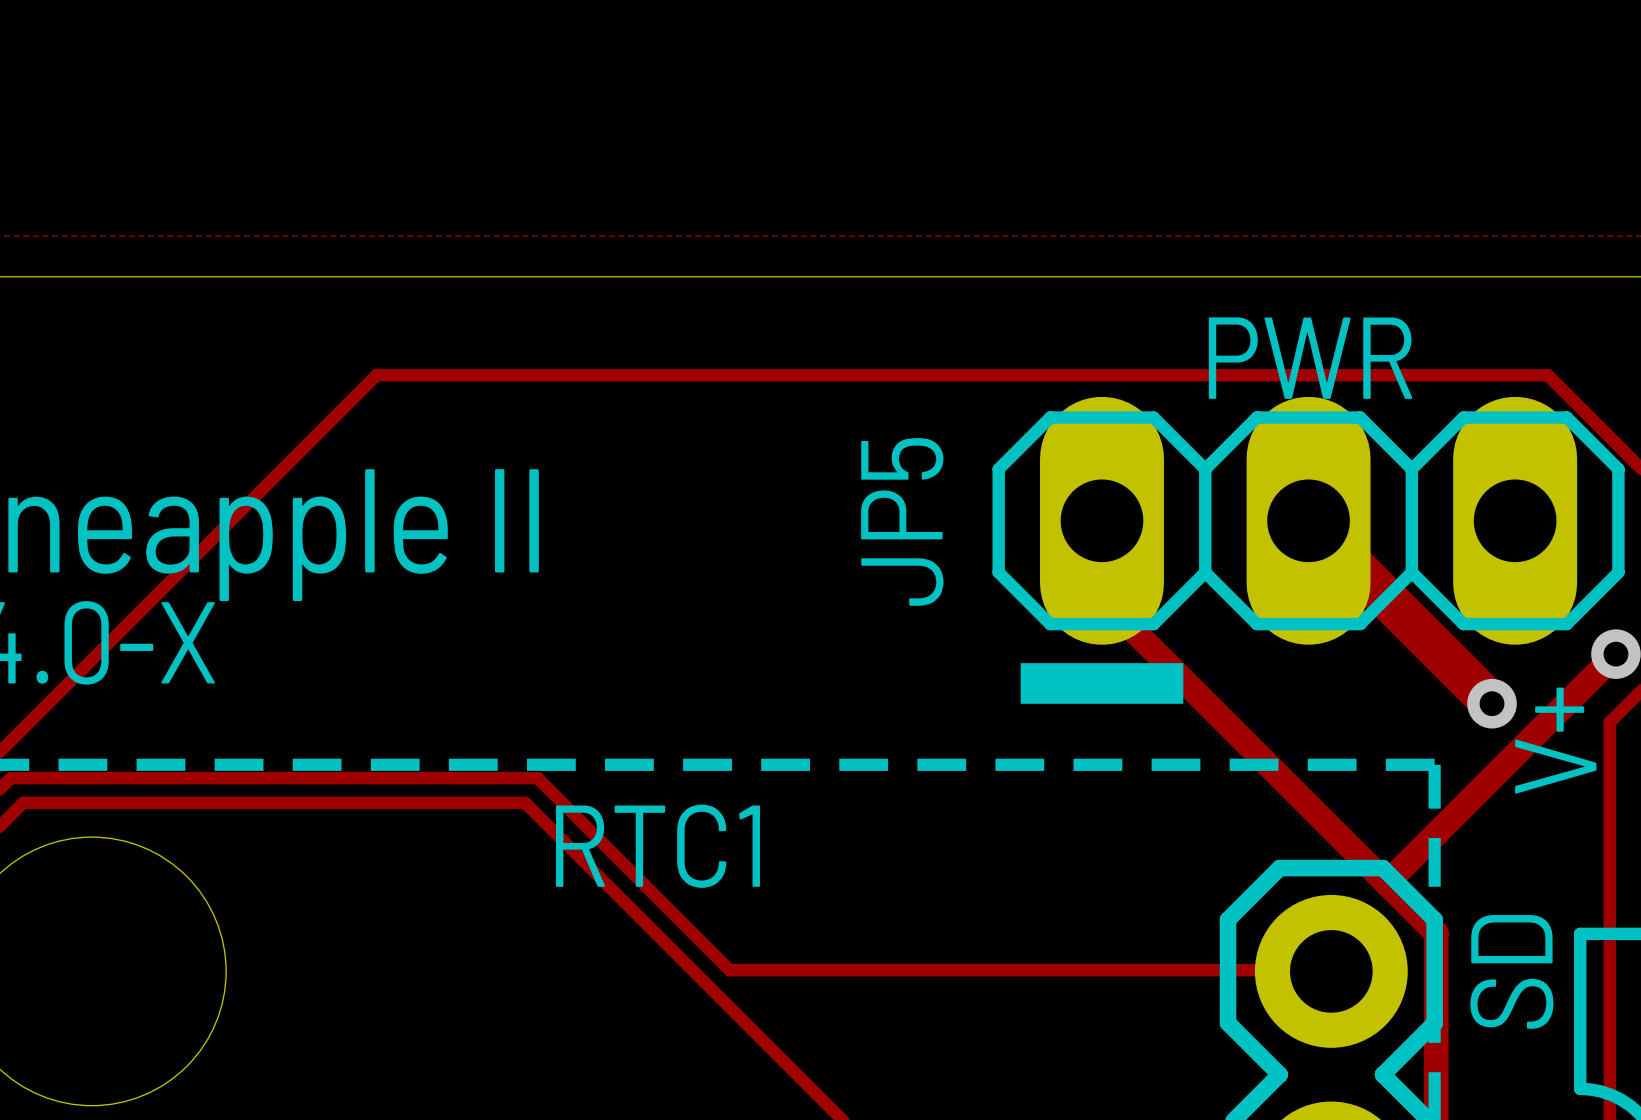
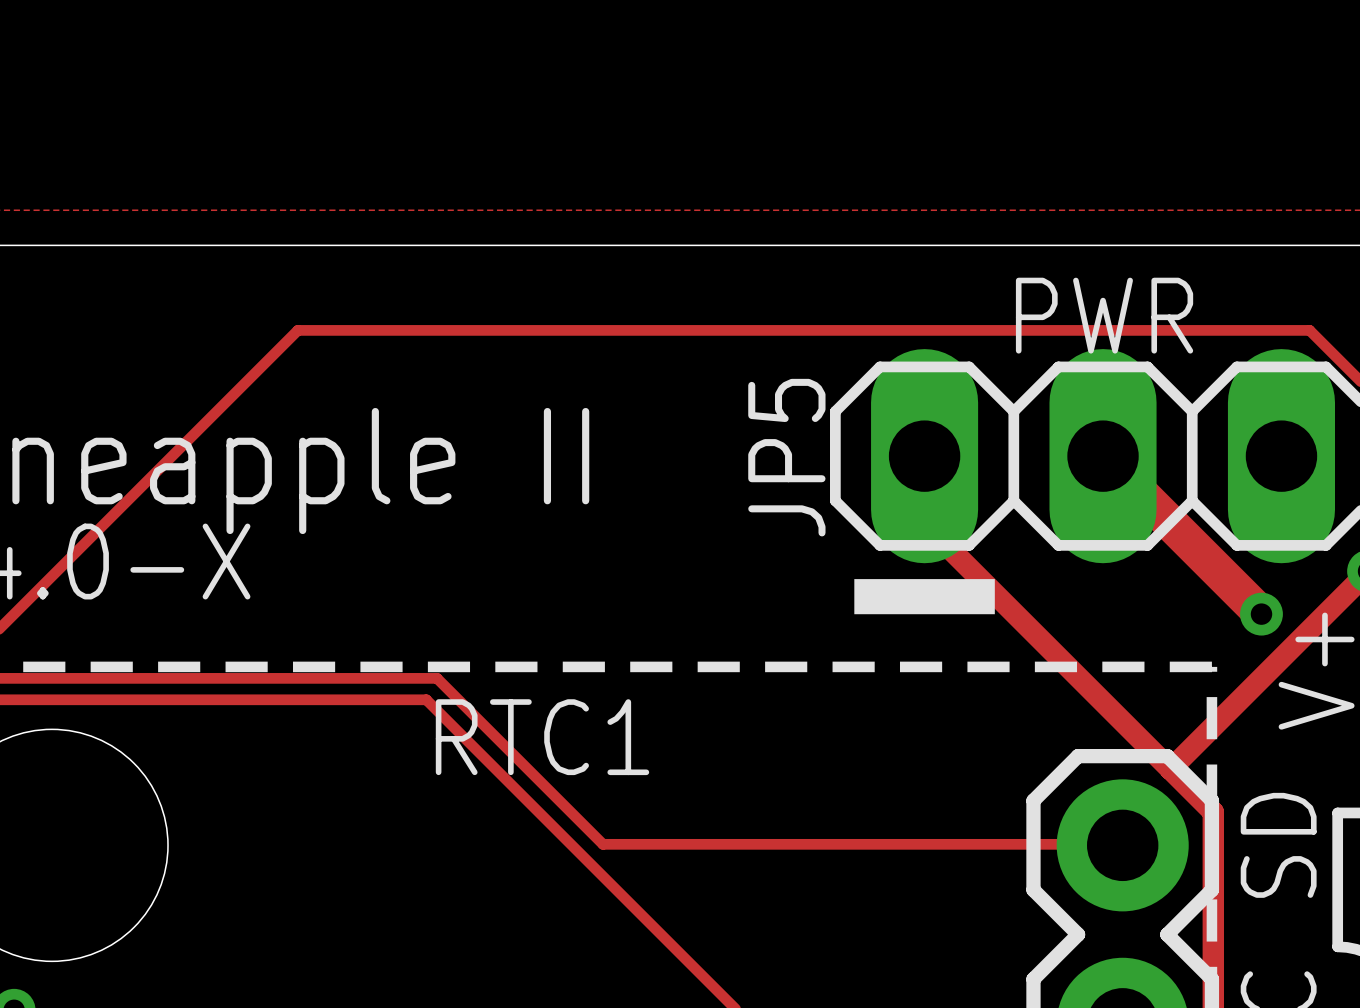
JP5 name position: JP5 (902, 521) -> JP5 (786, 457)

